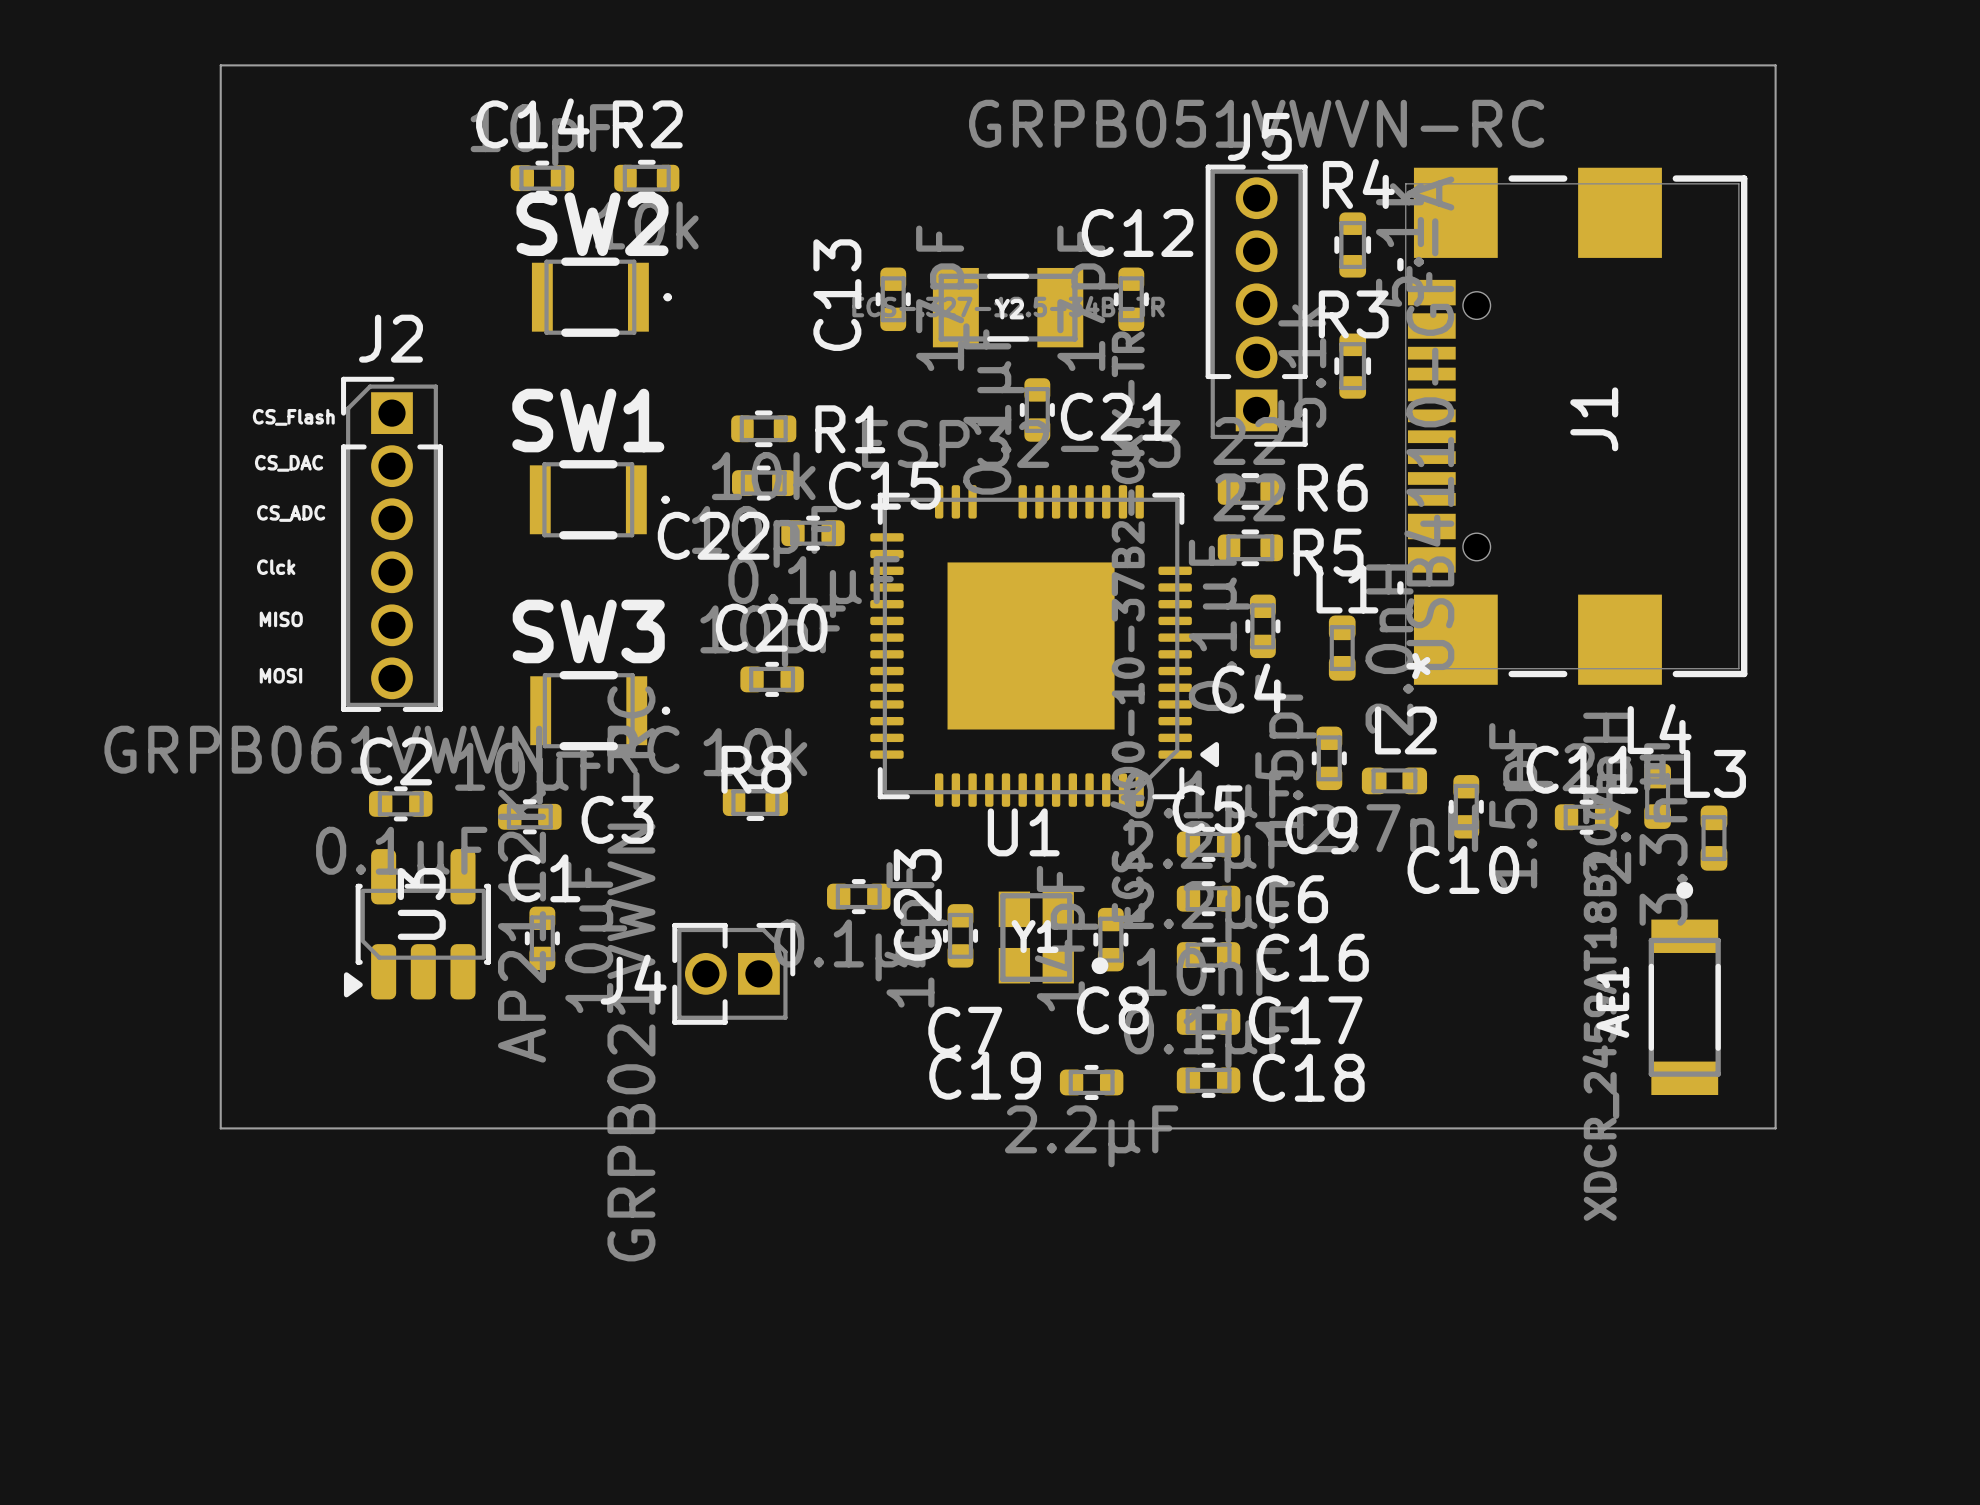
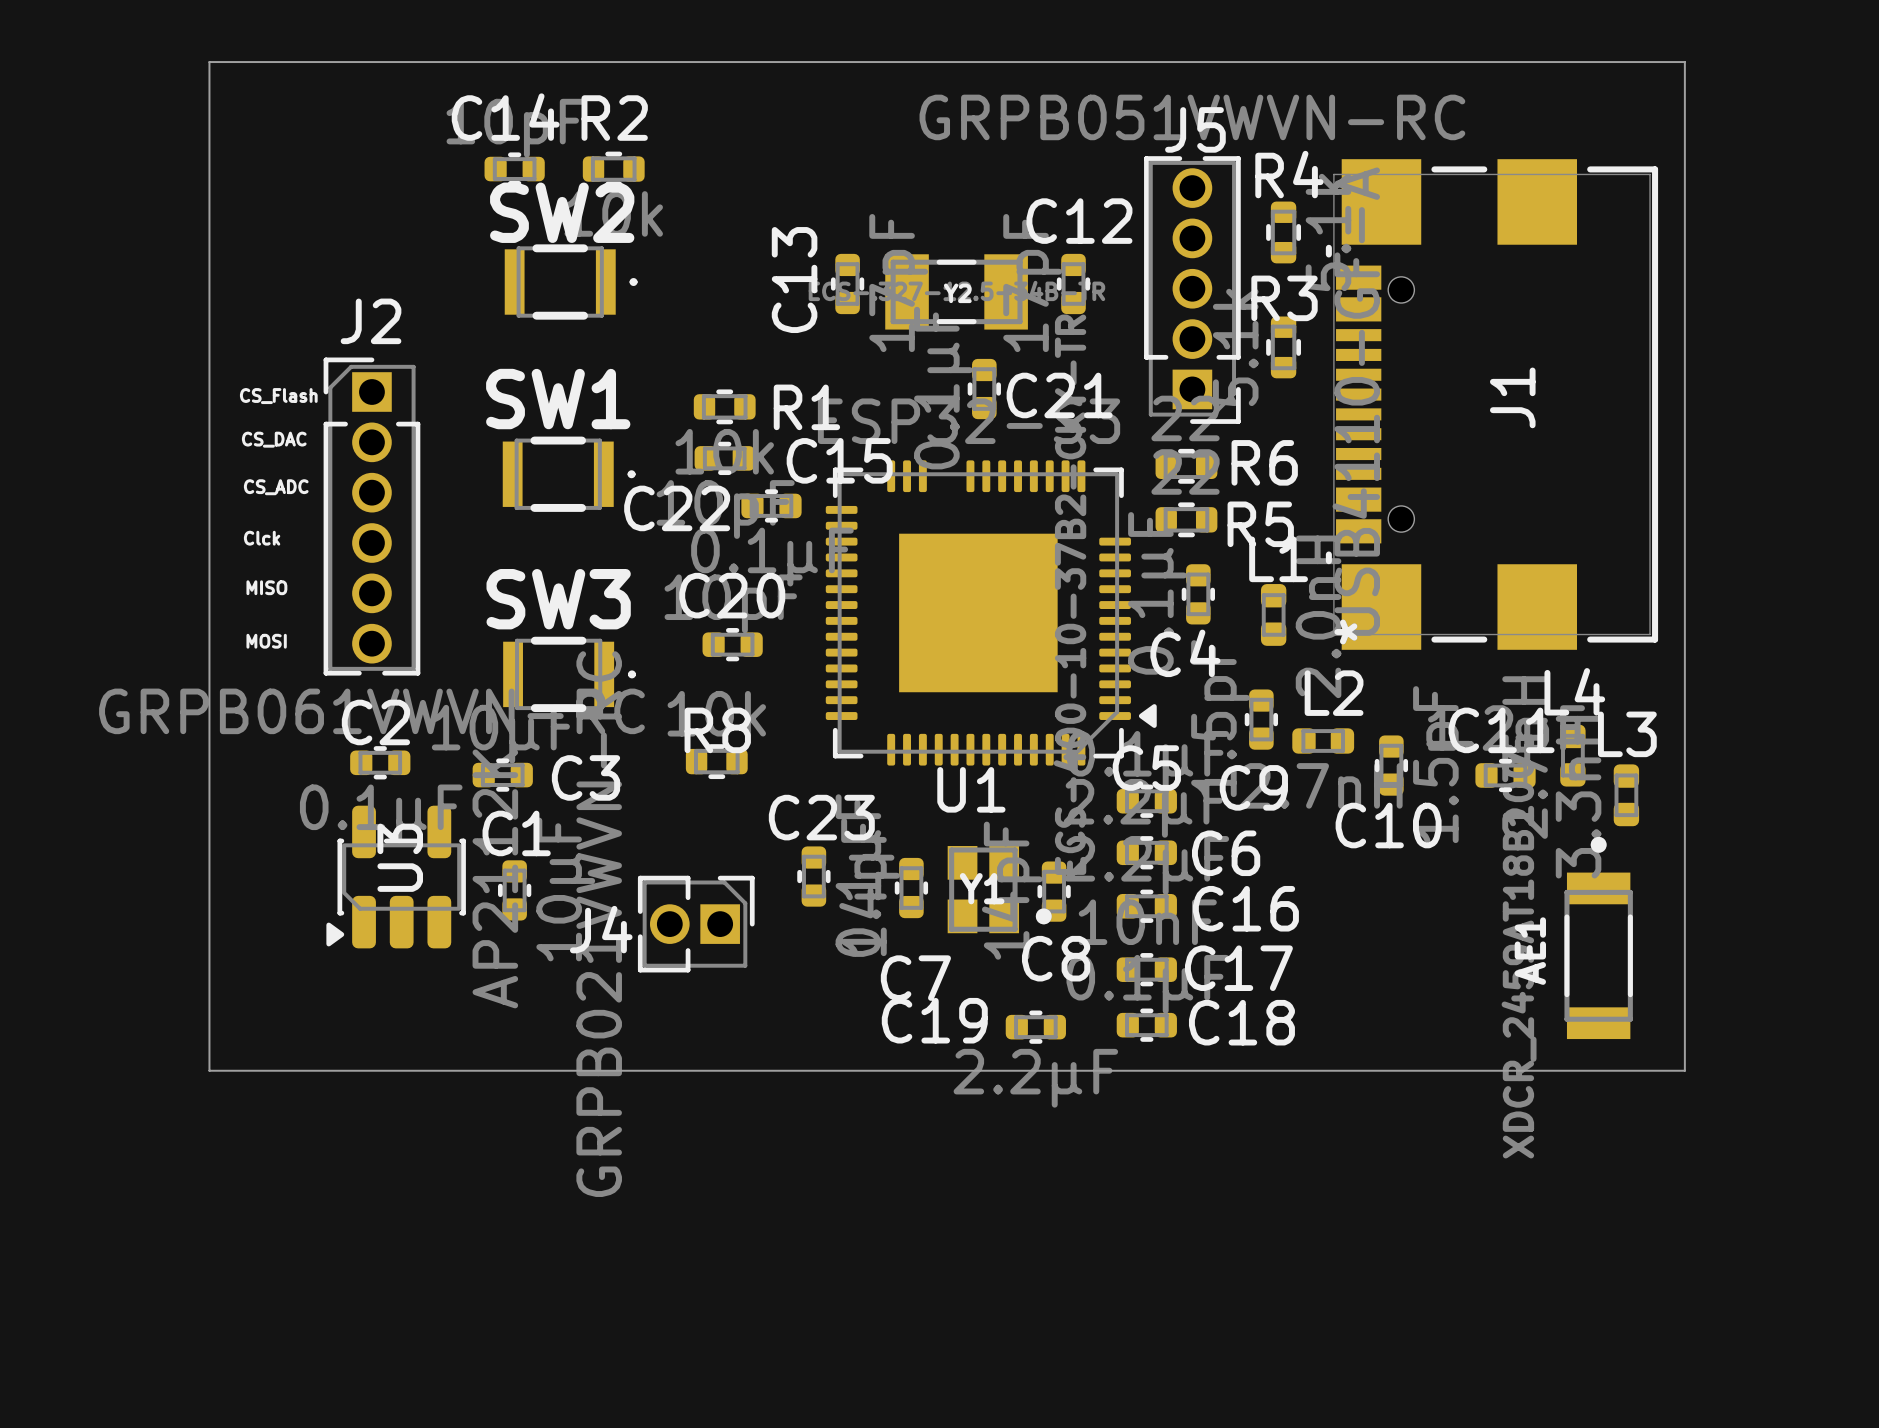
C23 rotation: 0° (858, 896) -> 90° clockwise (813, 876)
C23 name position: C23 (917, 904) -> C23 (821, 817)

